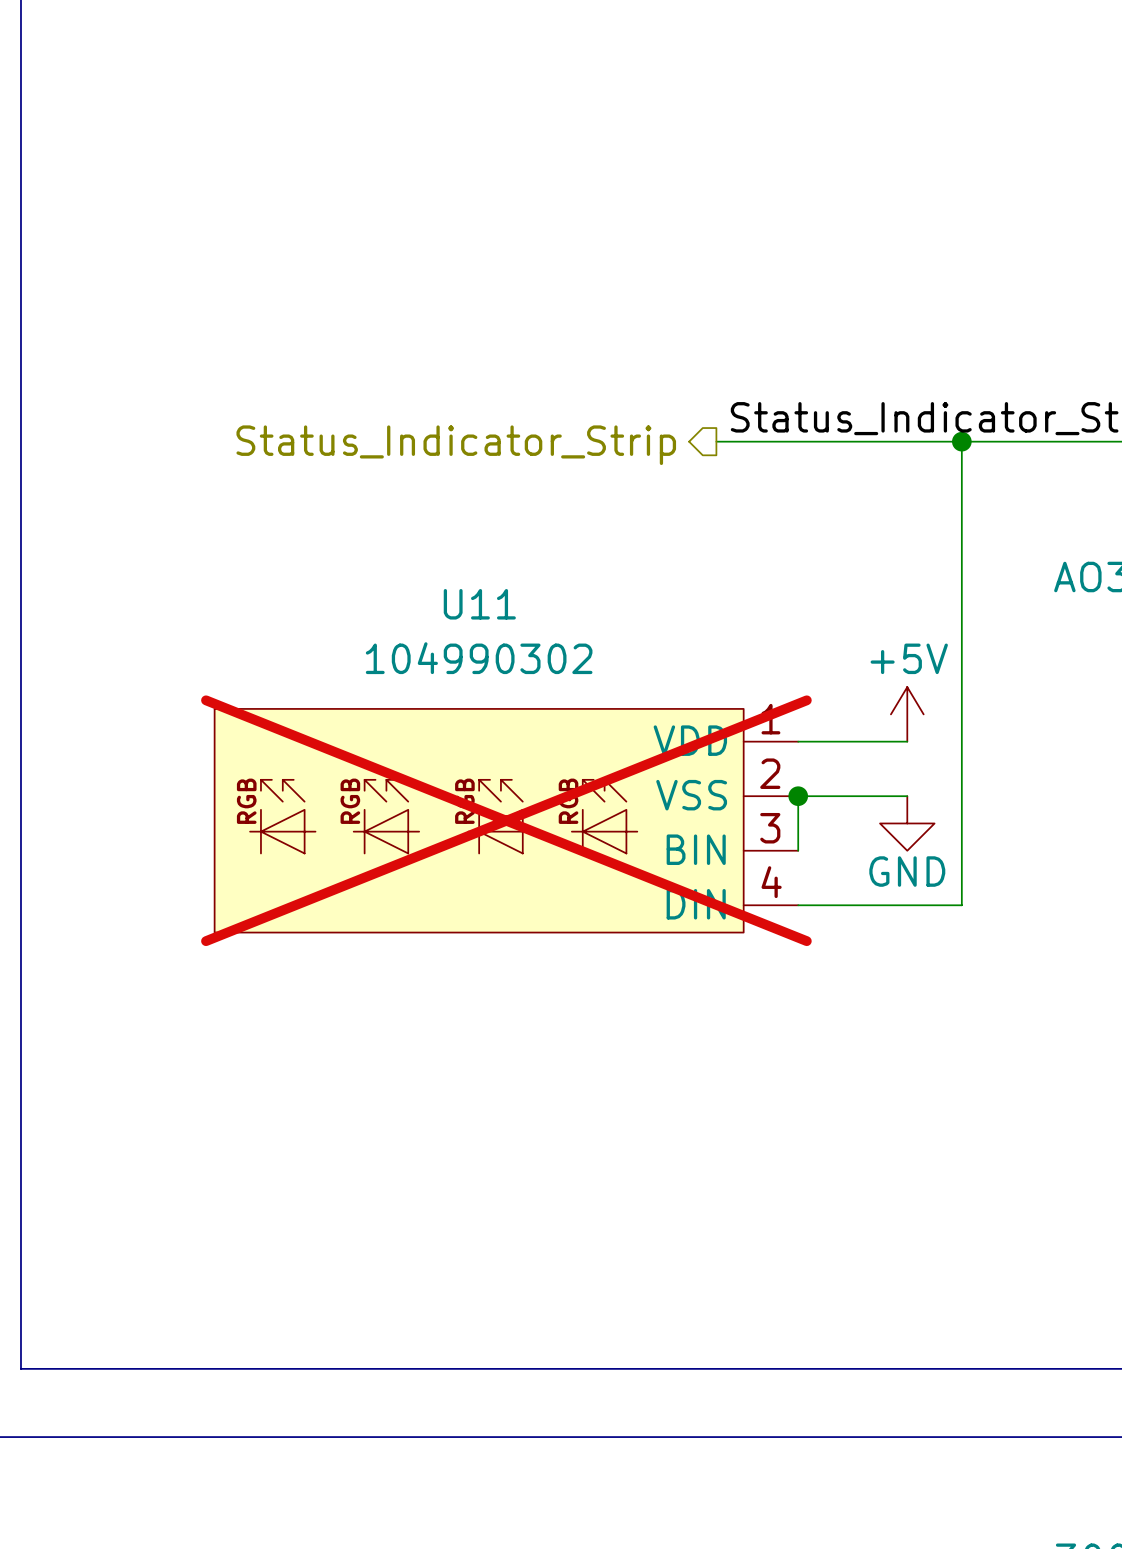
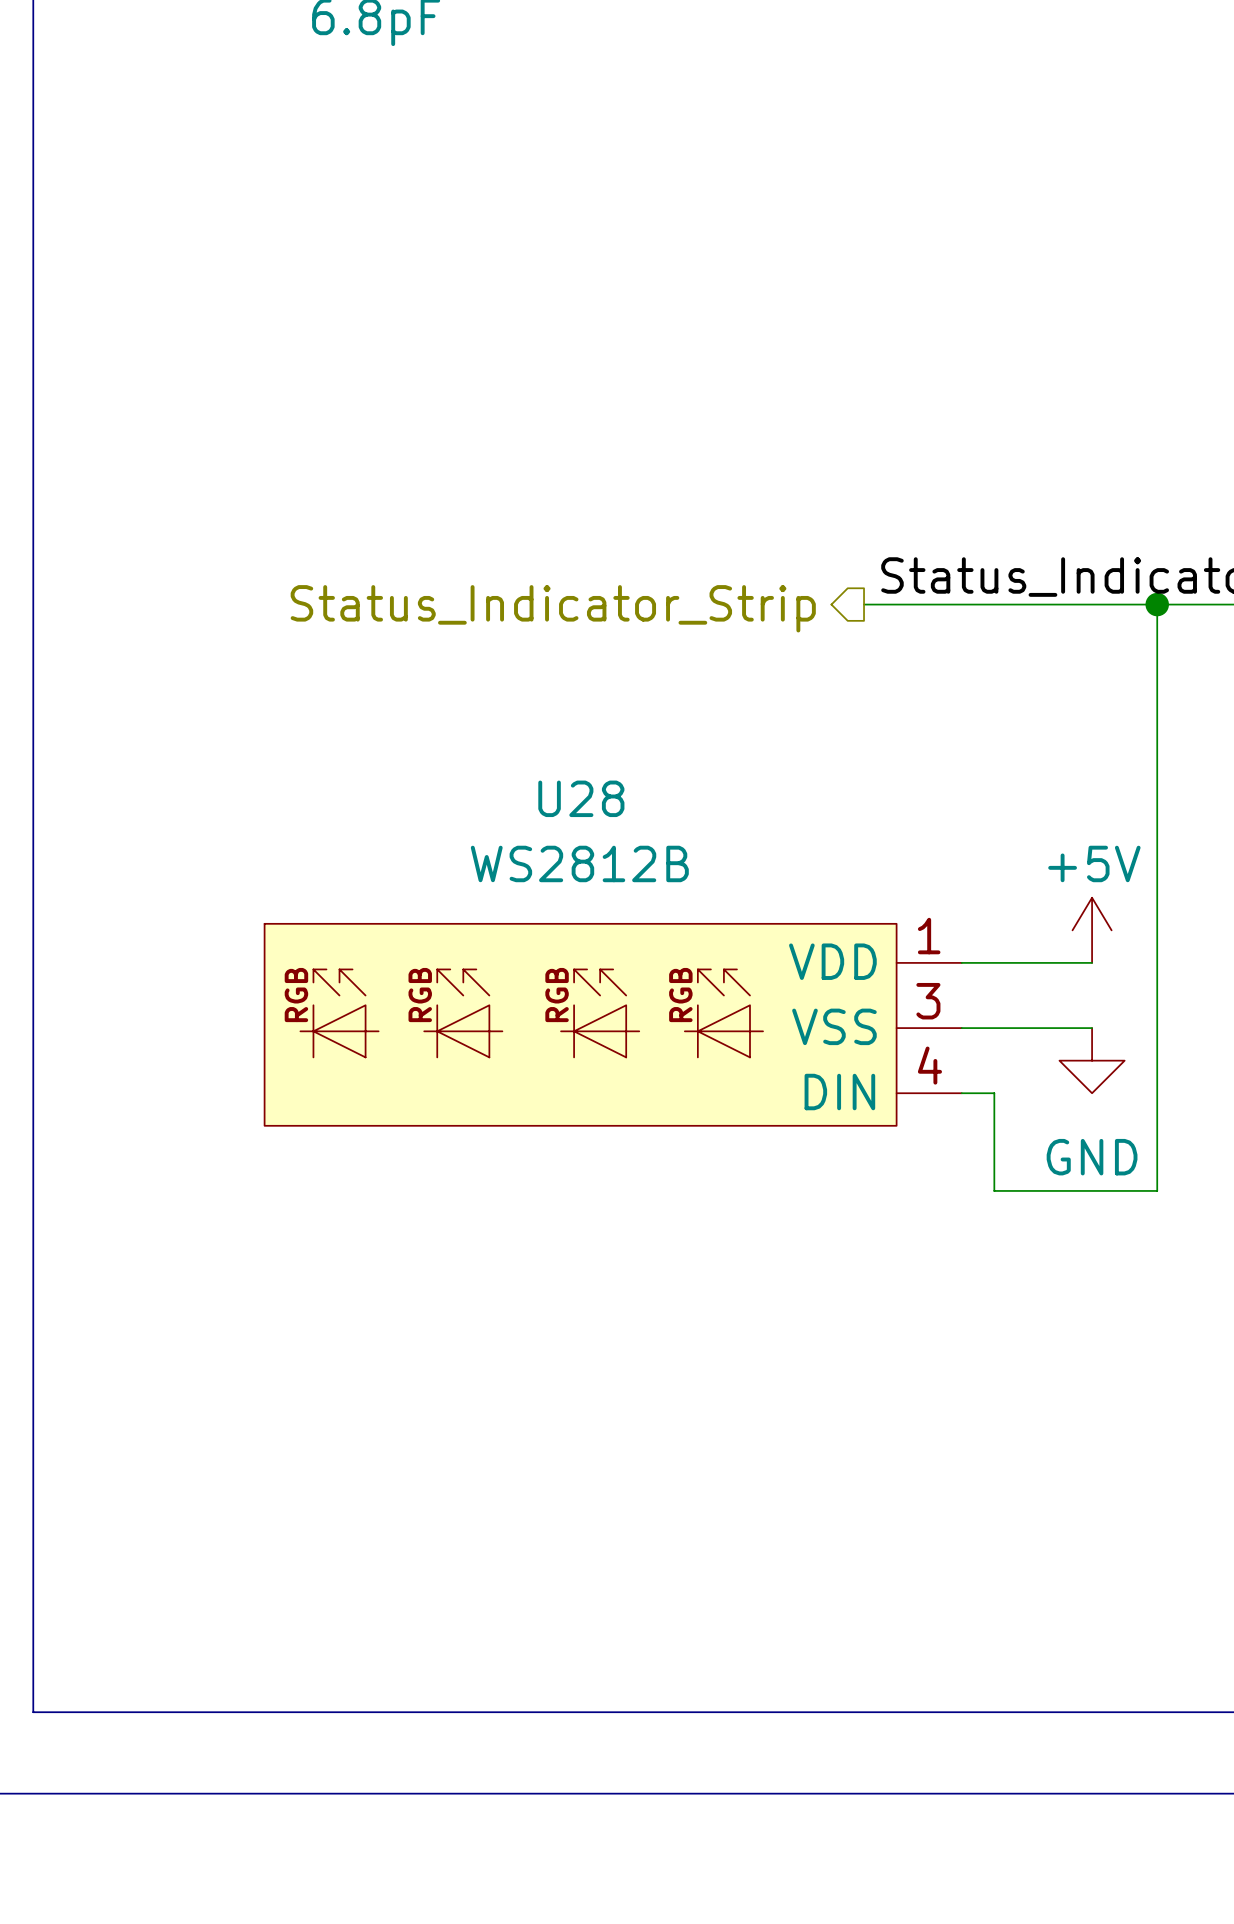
U28: none -> WS2812B (613, 1024)
wire: (798, 796) (798, 850) -> none
junction: (798, 796) -> none
U11: 104990302 (506, 820) -> none
power symbol text position: GND (907, 871) -> GND (1092, 1157)
wire: (798, 905) (961, 905) -> (961, 1093) (994, 1093) (994, 1190) (1157, 1190) (1157, 1158)

